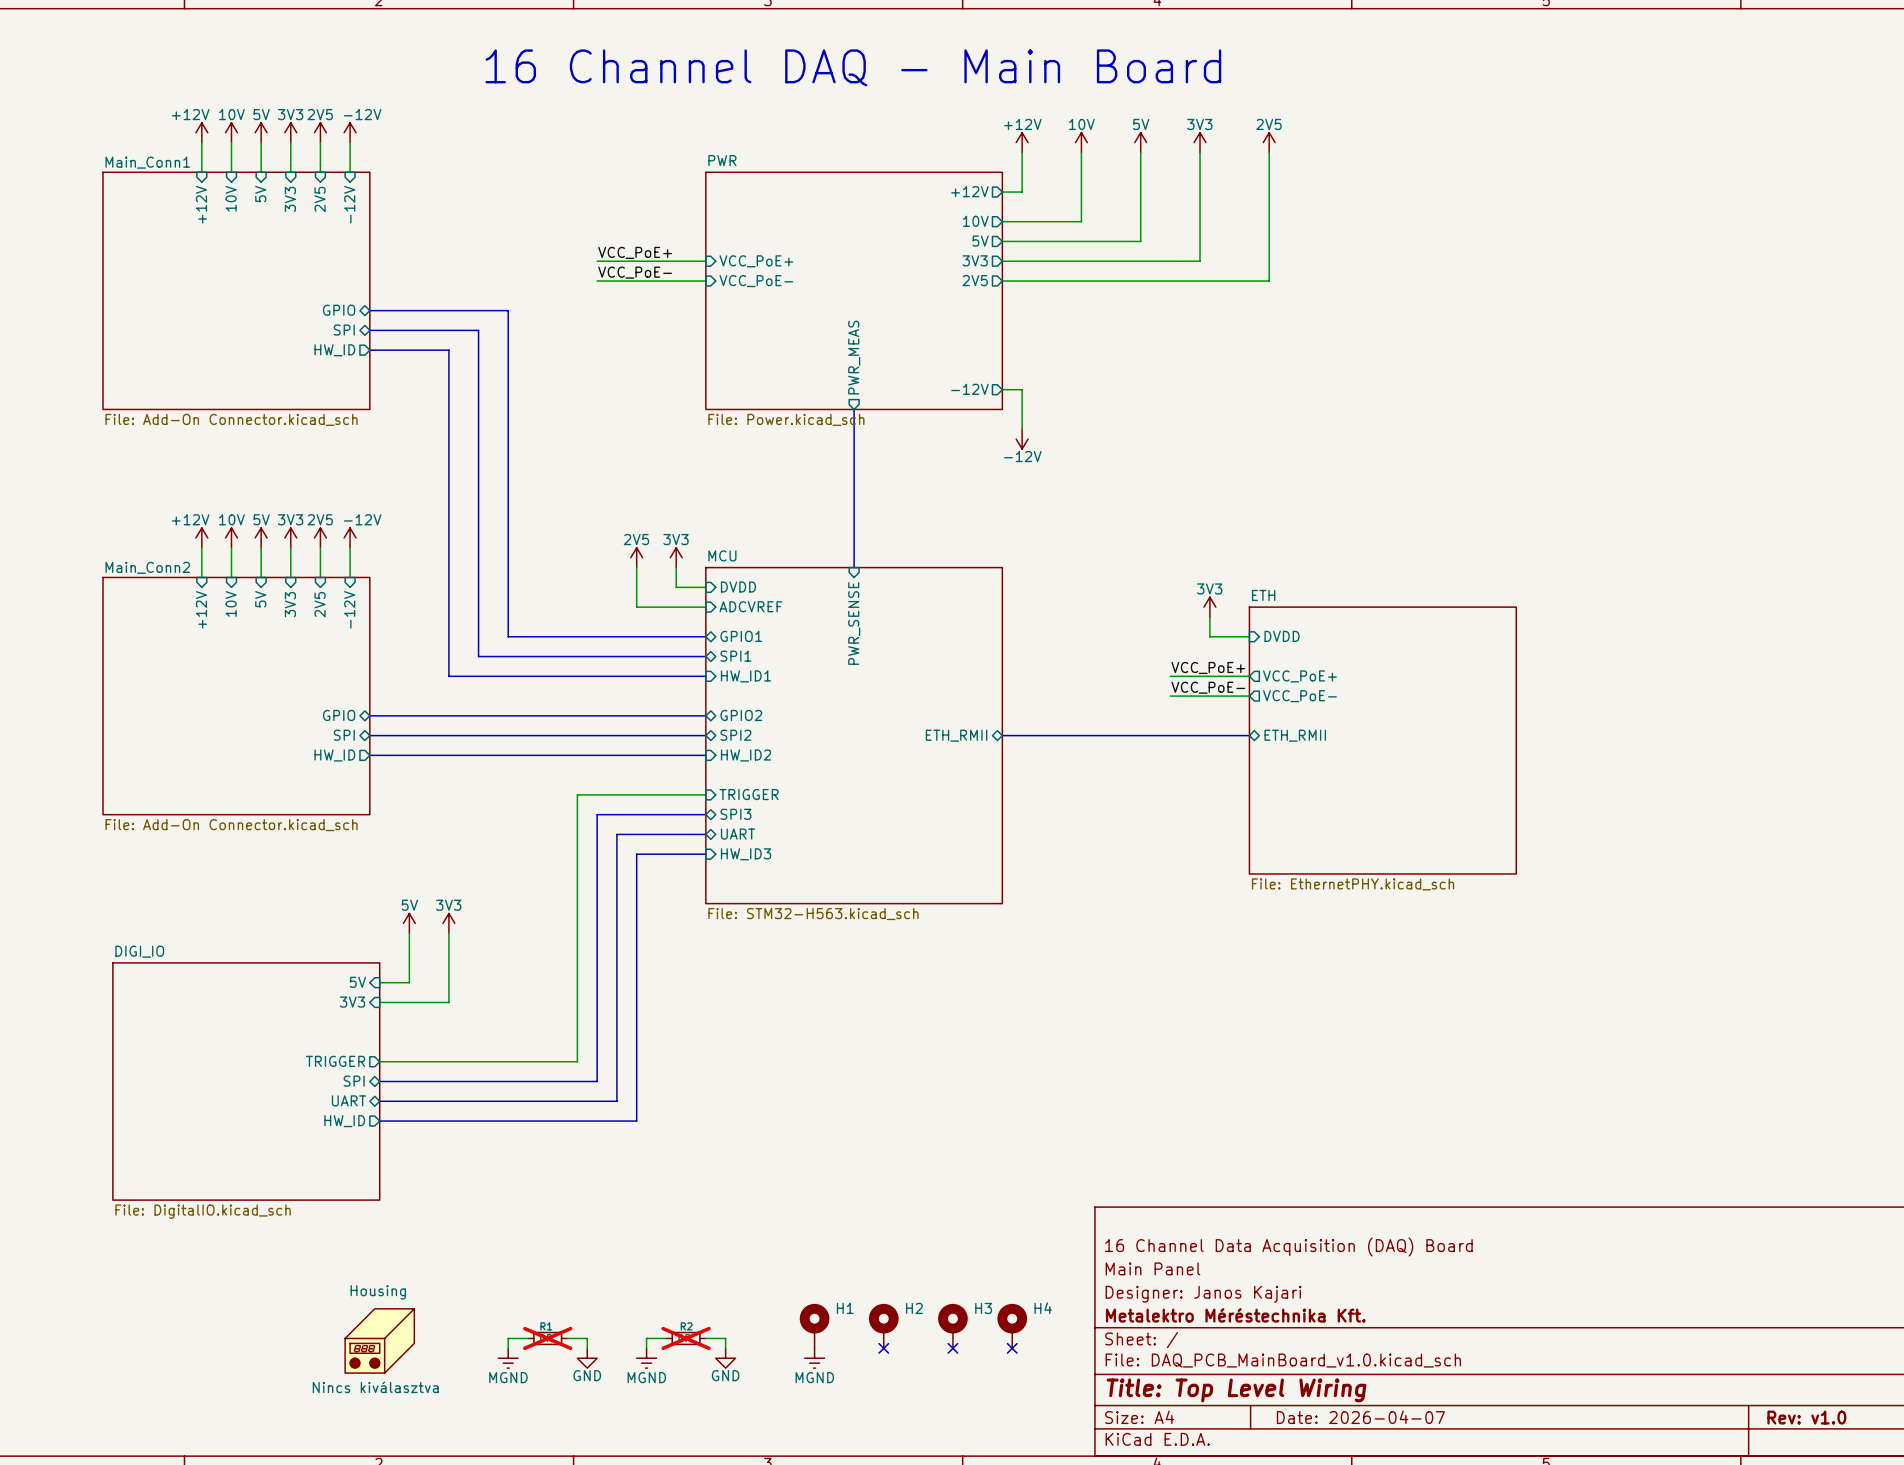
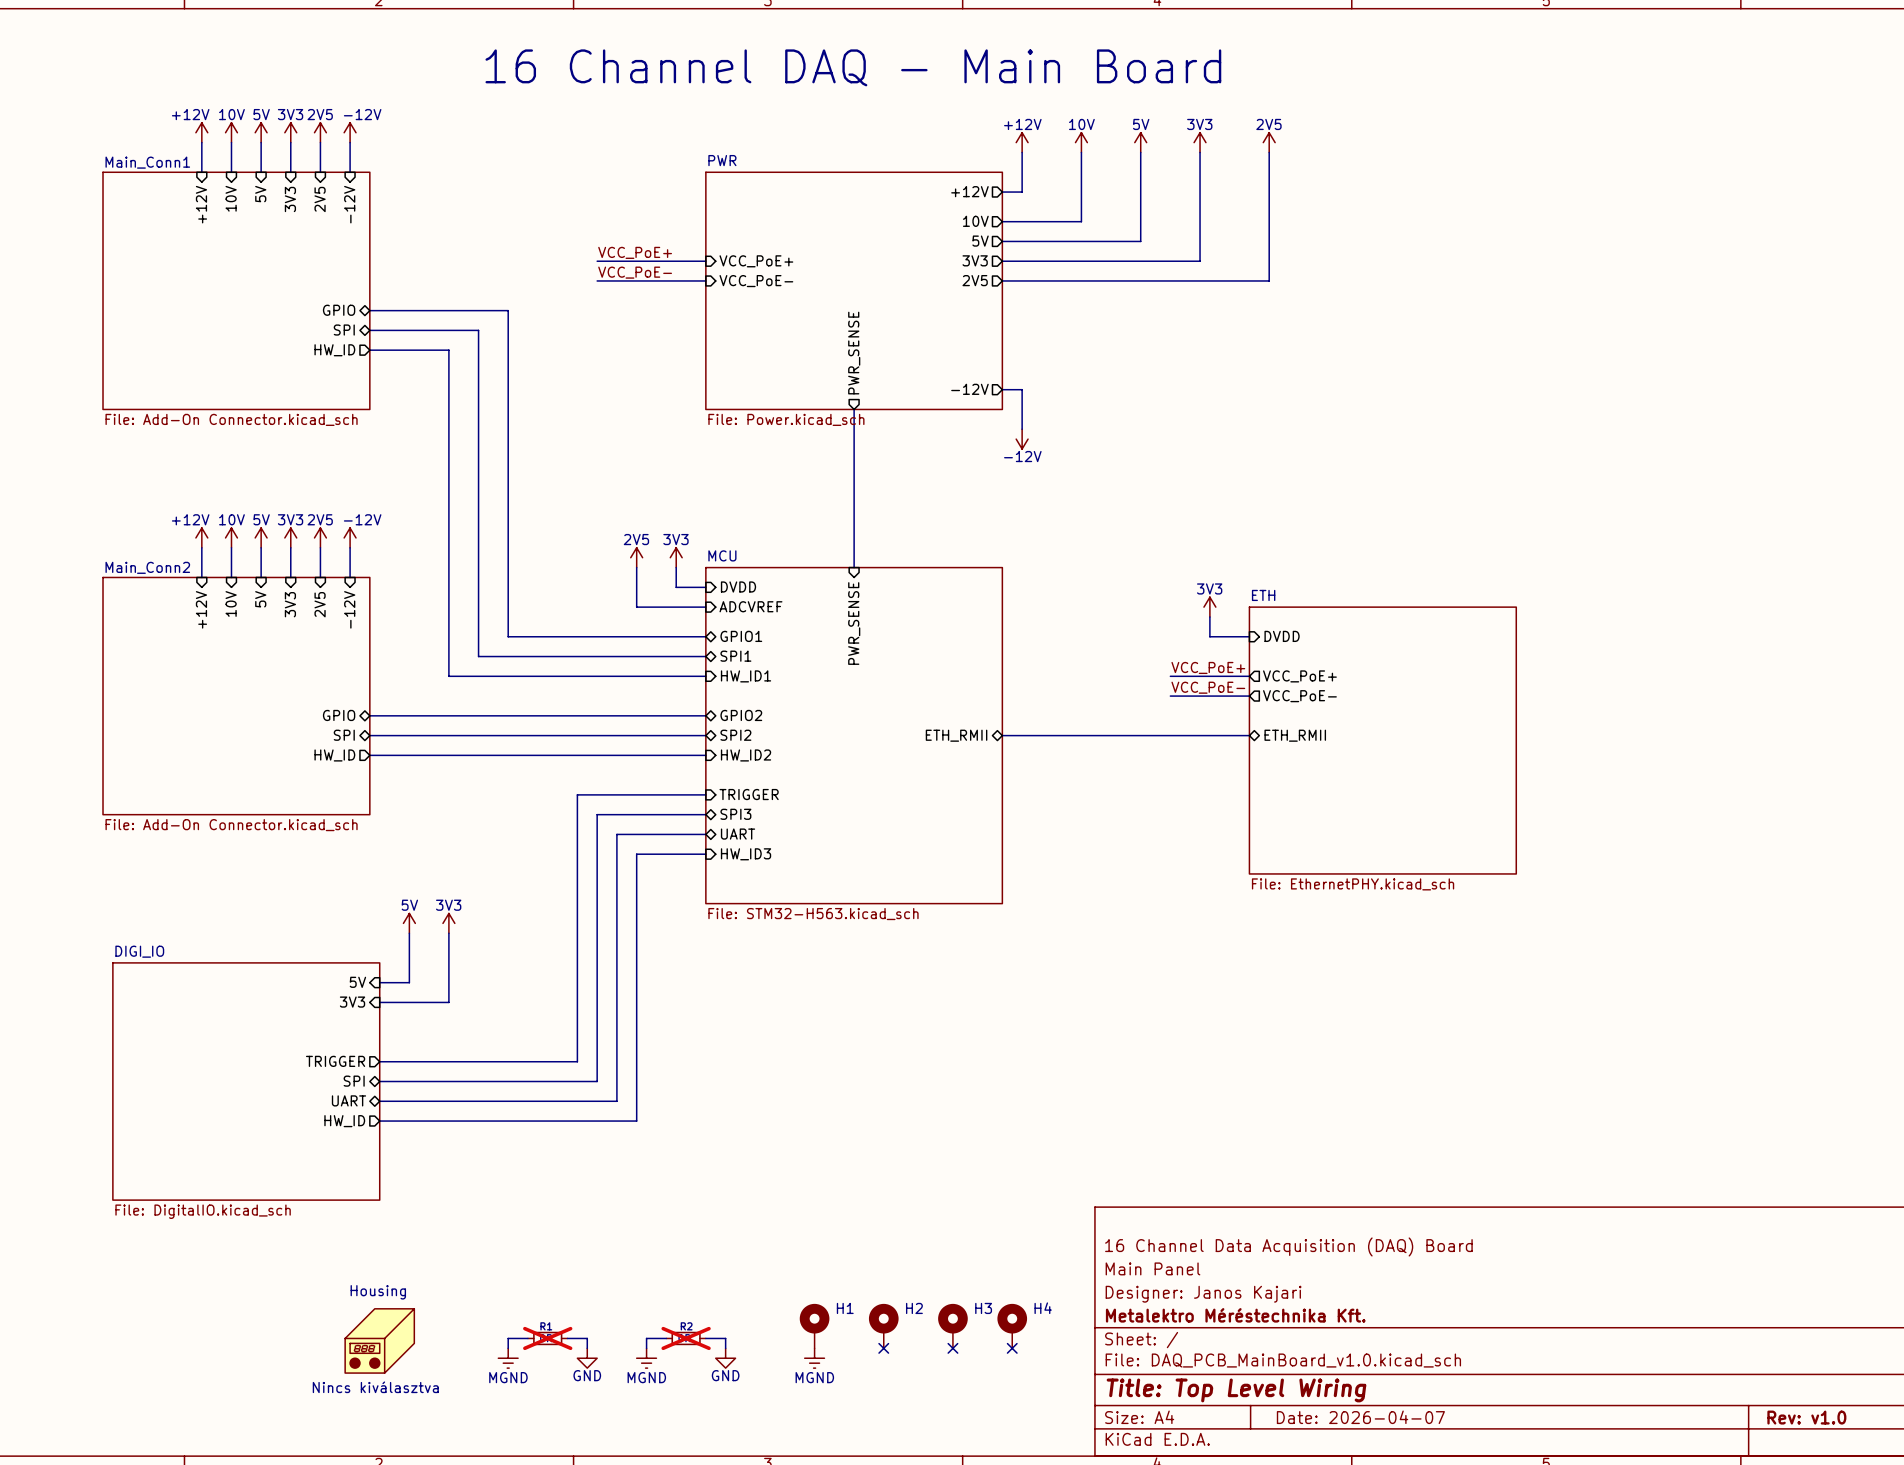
sheet pin: PWR_MEAS (854, 357) -> PWR_SENSE (854, 353)

